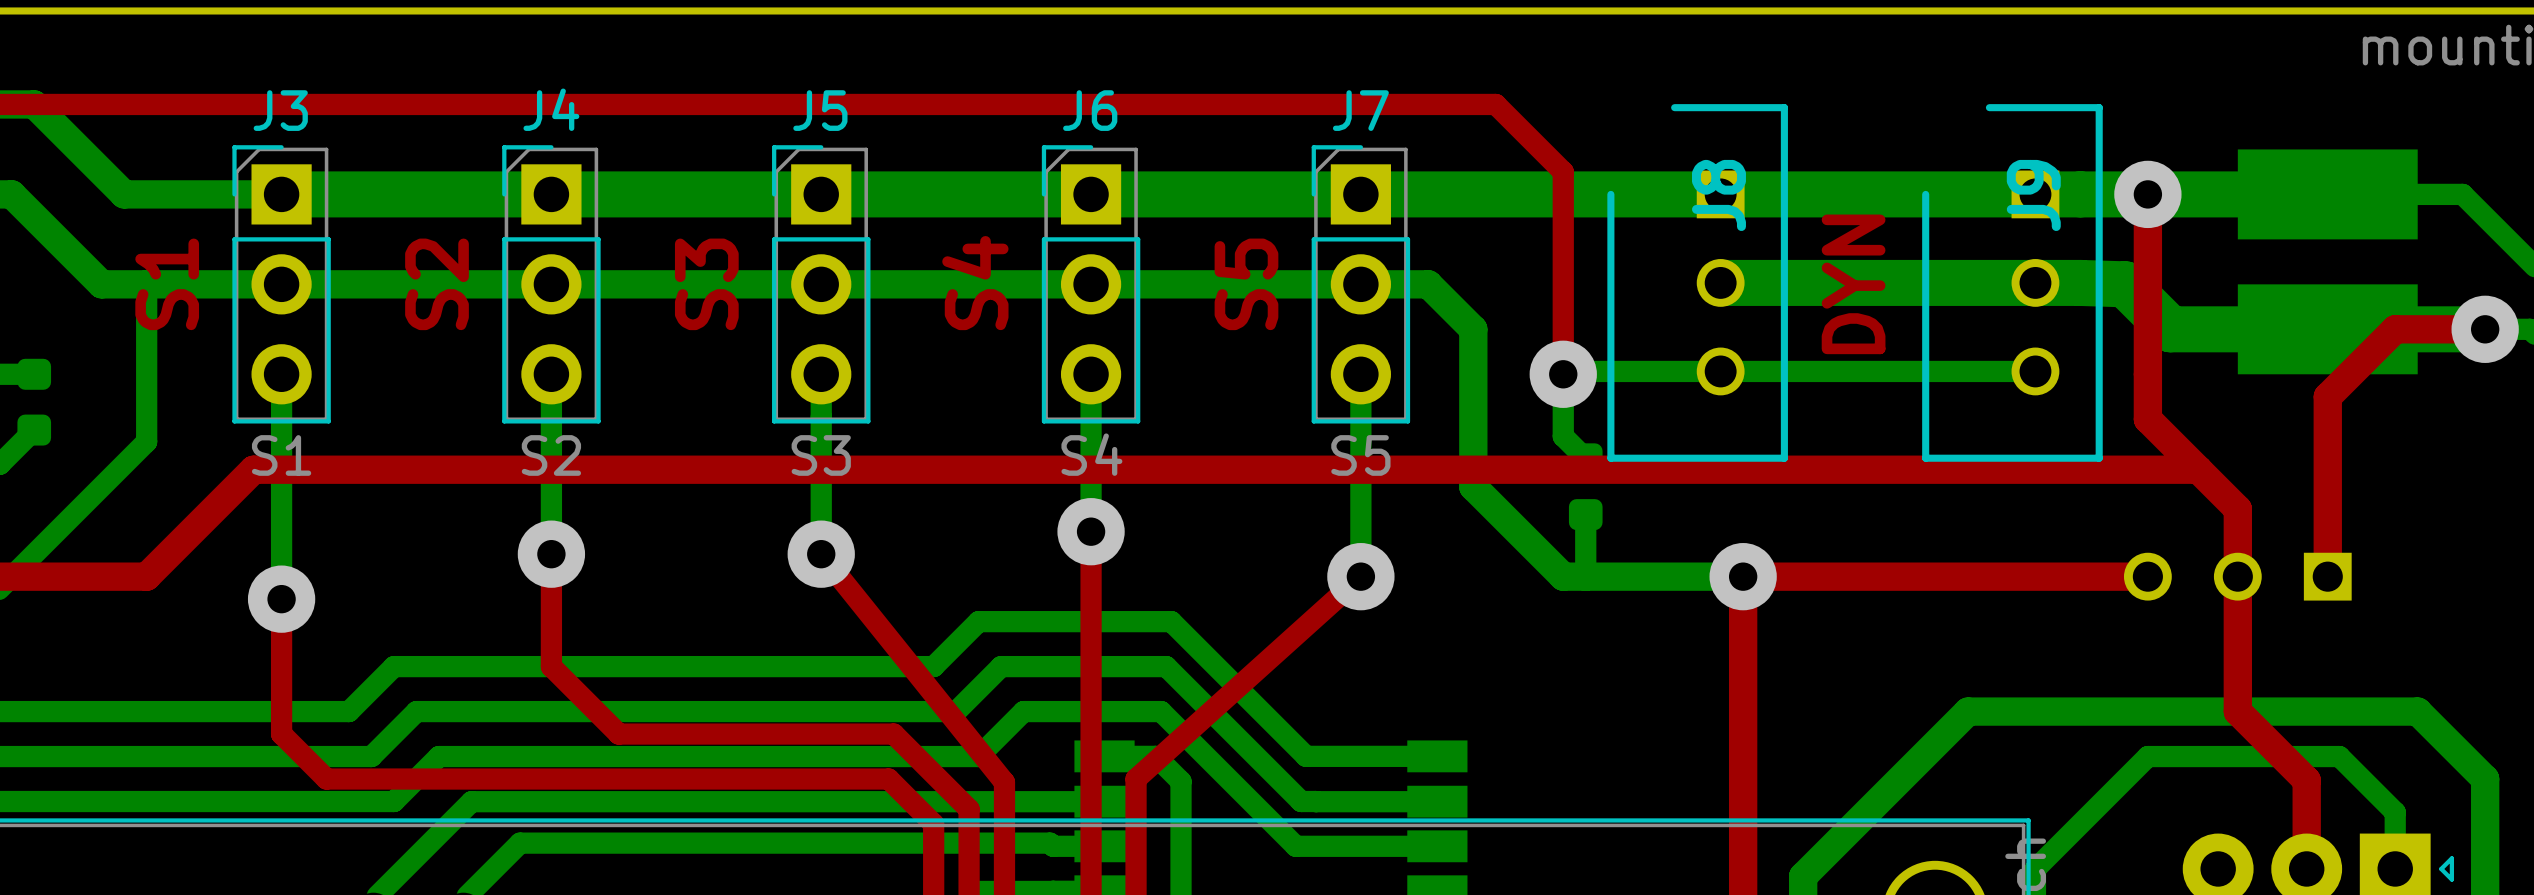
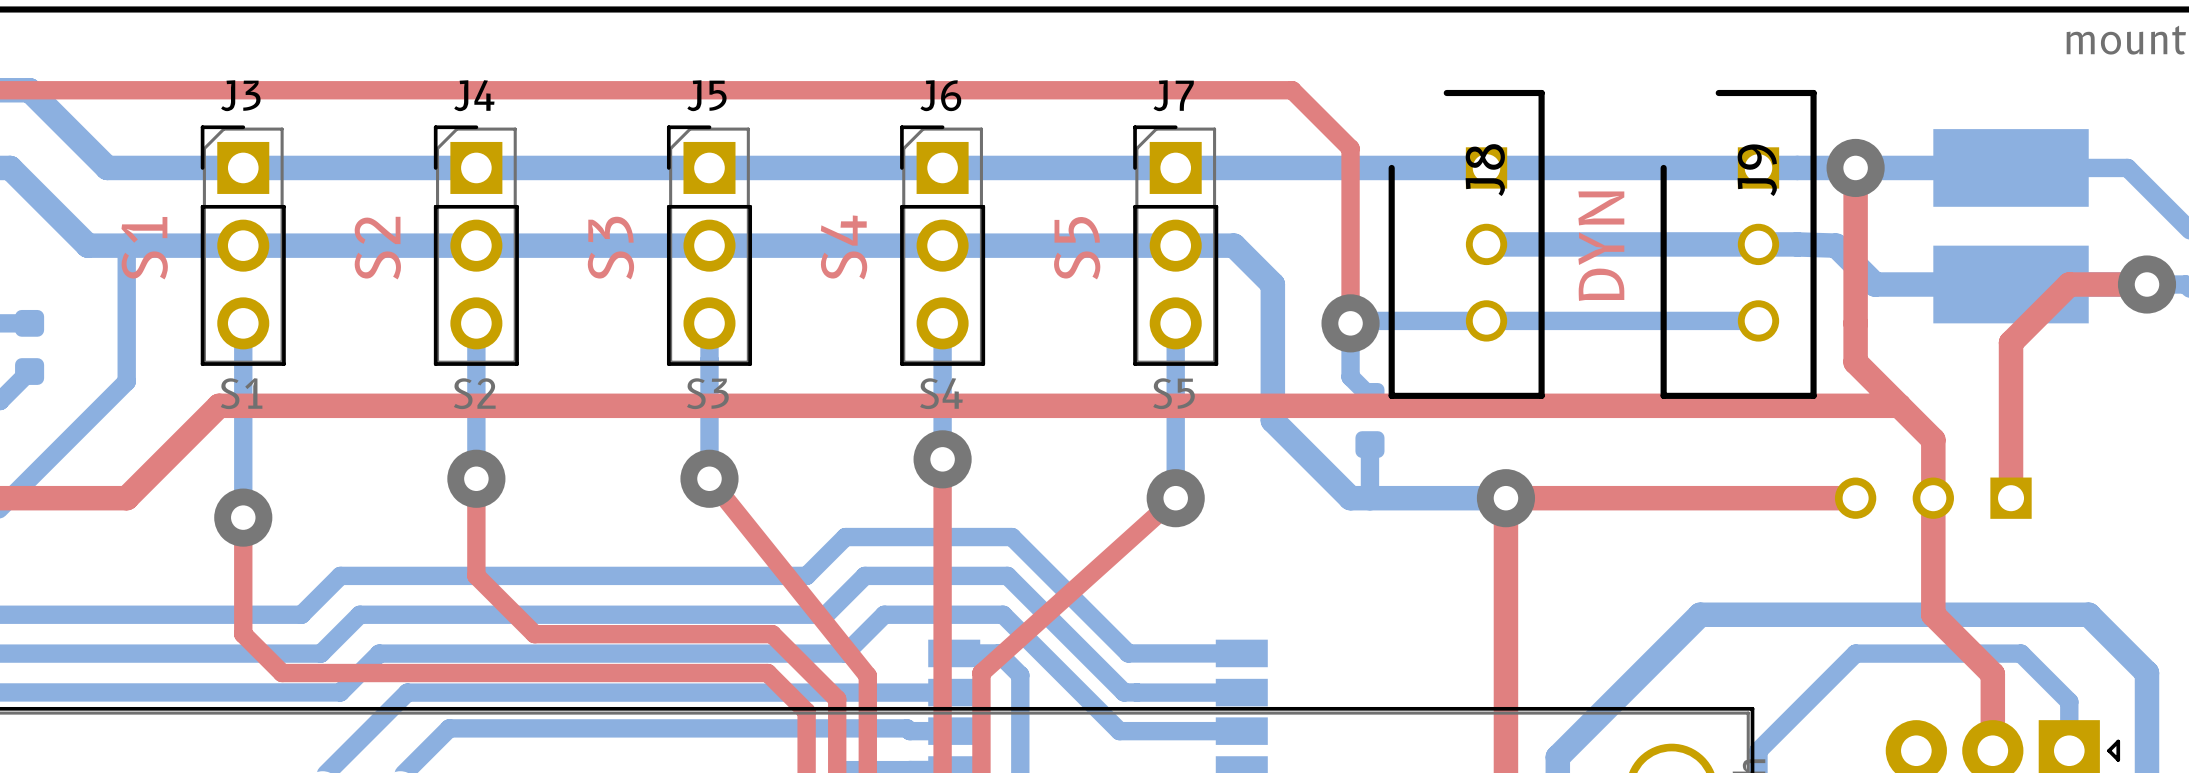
bottom track width: thick (281, 194) (2395, 194) -> thin (243, 167) (2069, 167)
bottom track width: thick (1720, 282) (2125, 284) (2170, 329) (2485, 329) -> thin (1486, 244) (1836, 245) (1875, 284) (2147, 284)

